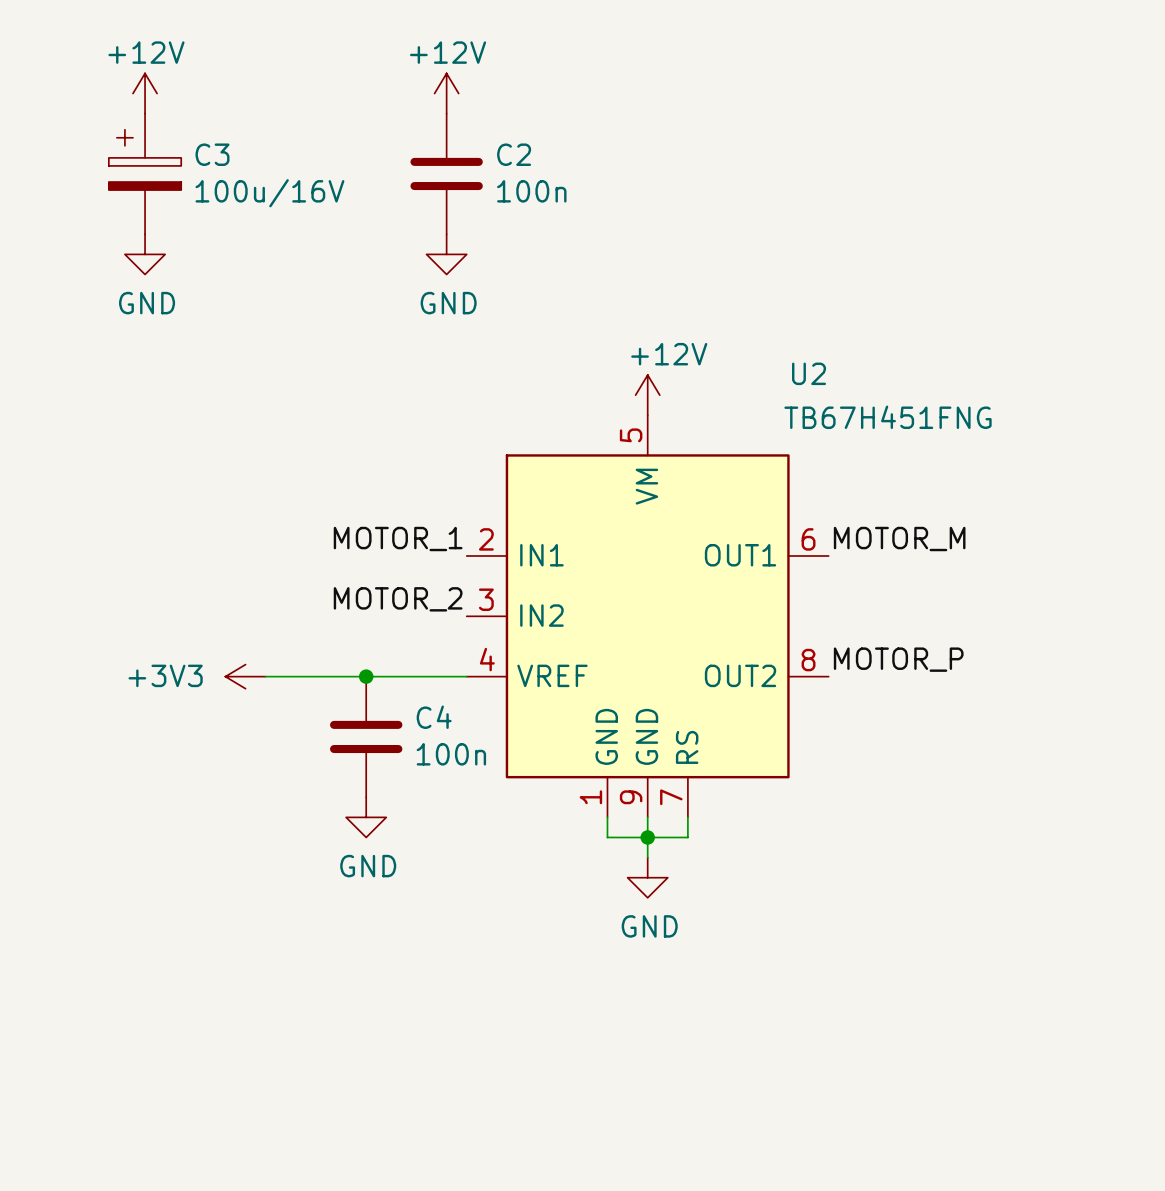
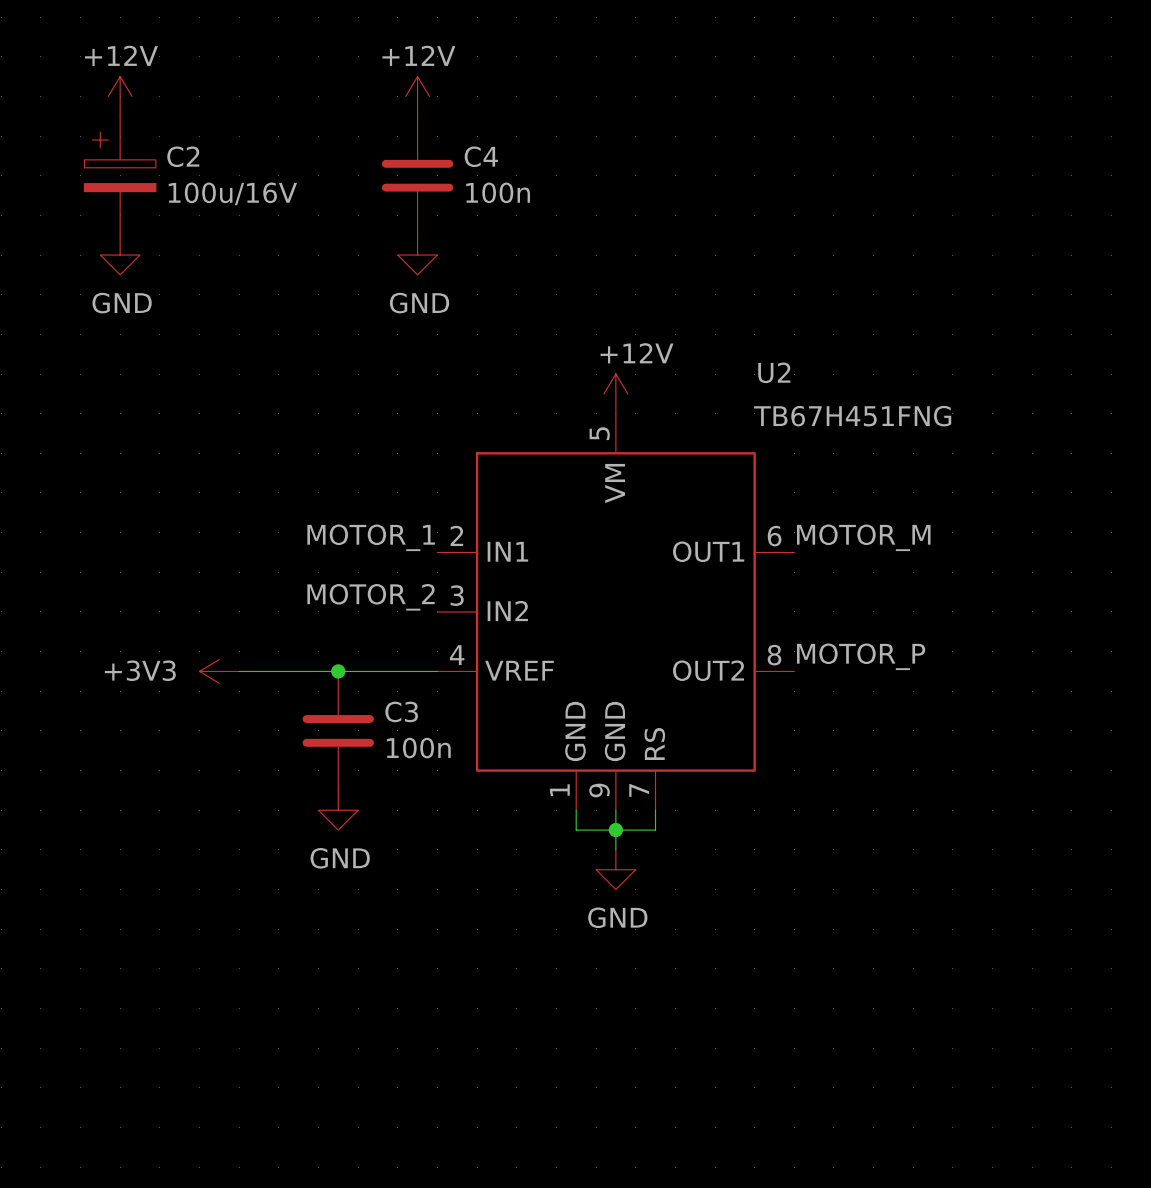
C3 name: C3 (212, 154) -> C2 (183, 156)
C2 name: C2 (514, 154) -> C4 (481, 156)
C4 name: C4 (434, 717) -> C3 (401, 711)

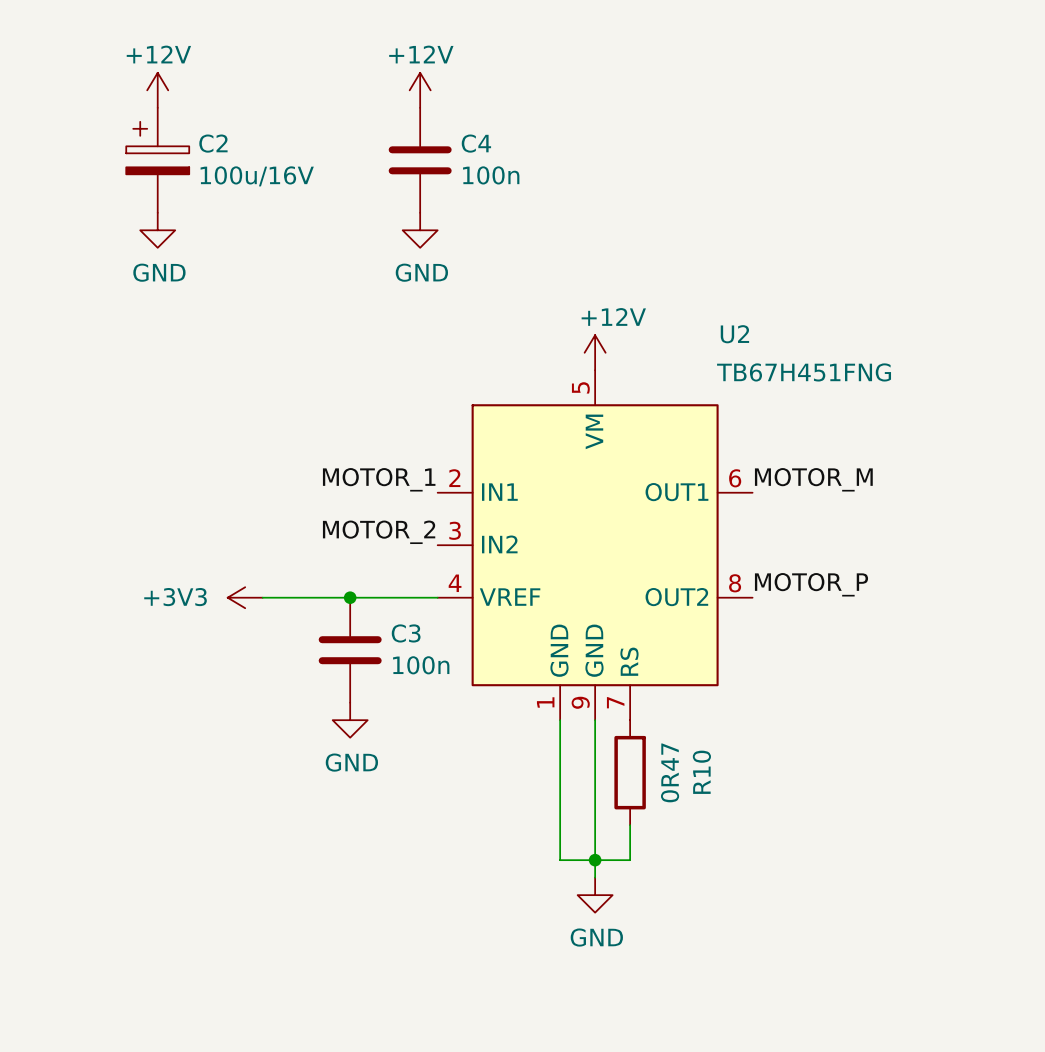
wire: (655, 810) (655, 830) (576, 830) -> (630, 825) (630, 860) (560, 860) (560, 737)
junction: (615, 830) -> none
wire: none -> (595, 755) (595, 877)
power symbol position: GND (615, 869) -> GND (595, 895)
R10: none -> 0R47 (630, 772)
junction: none -> (595, 860)

